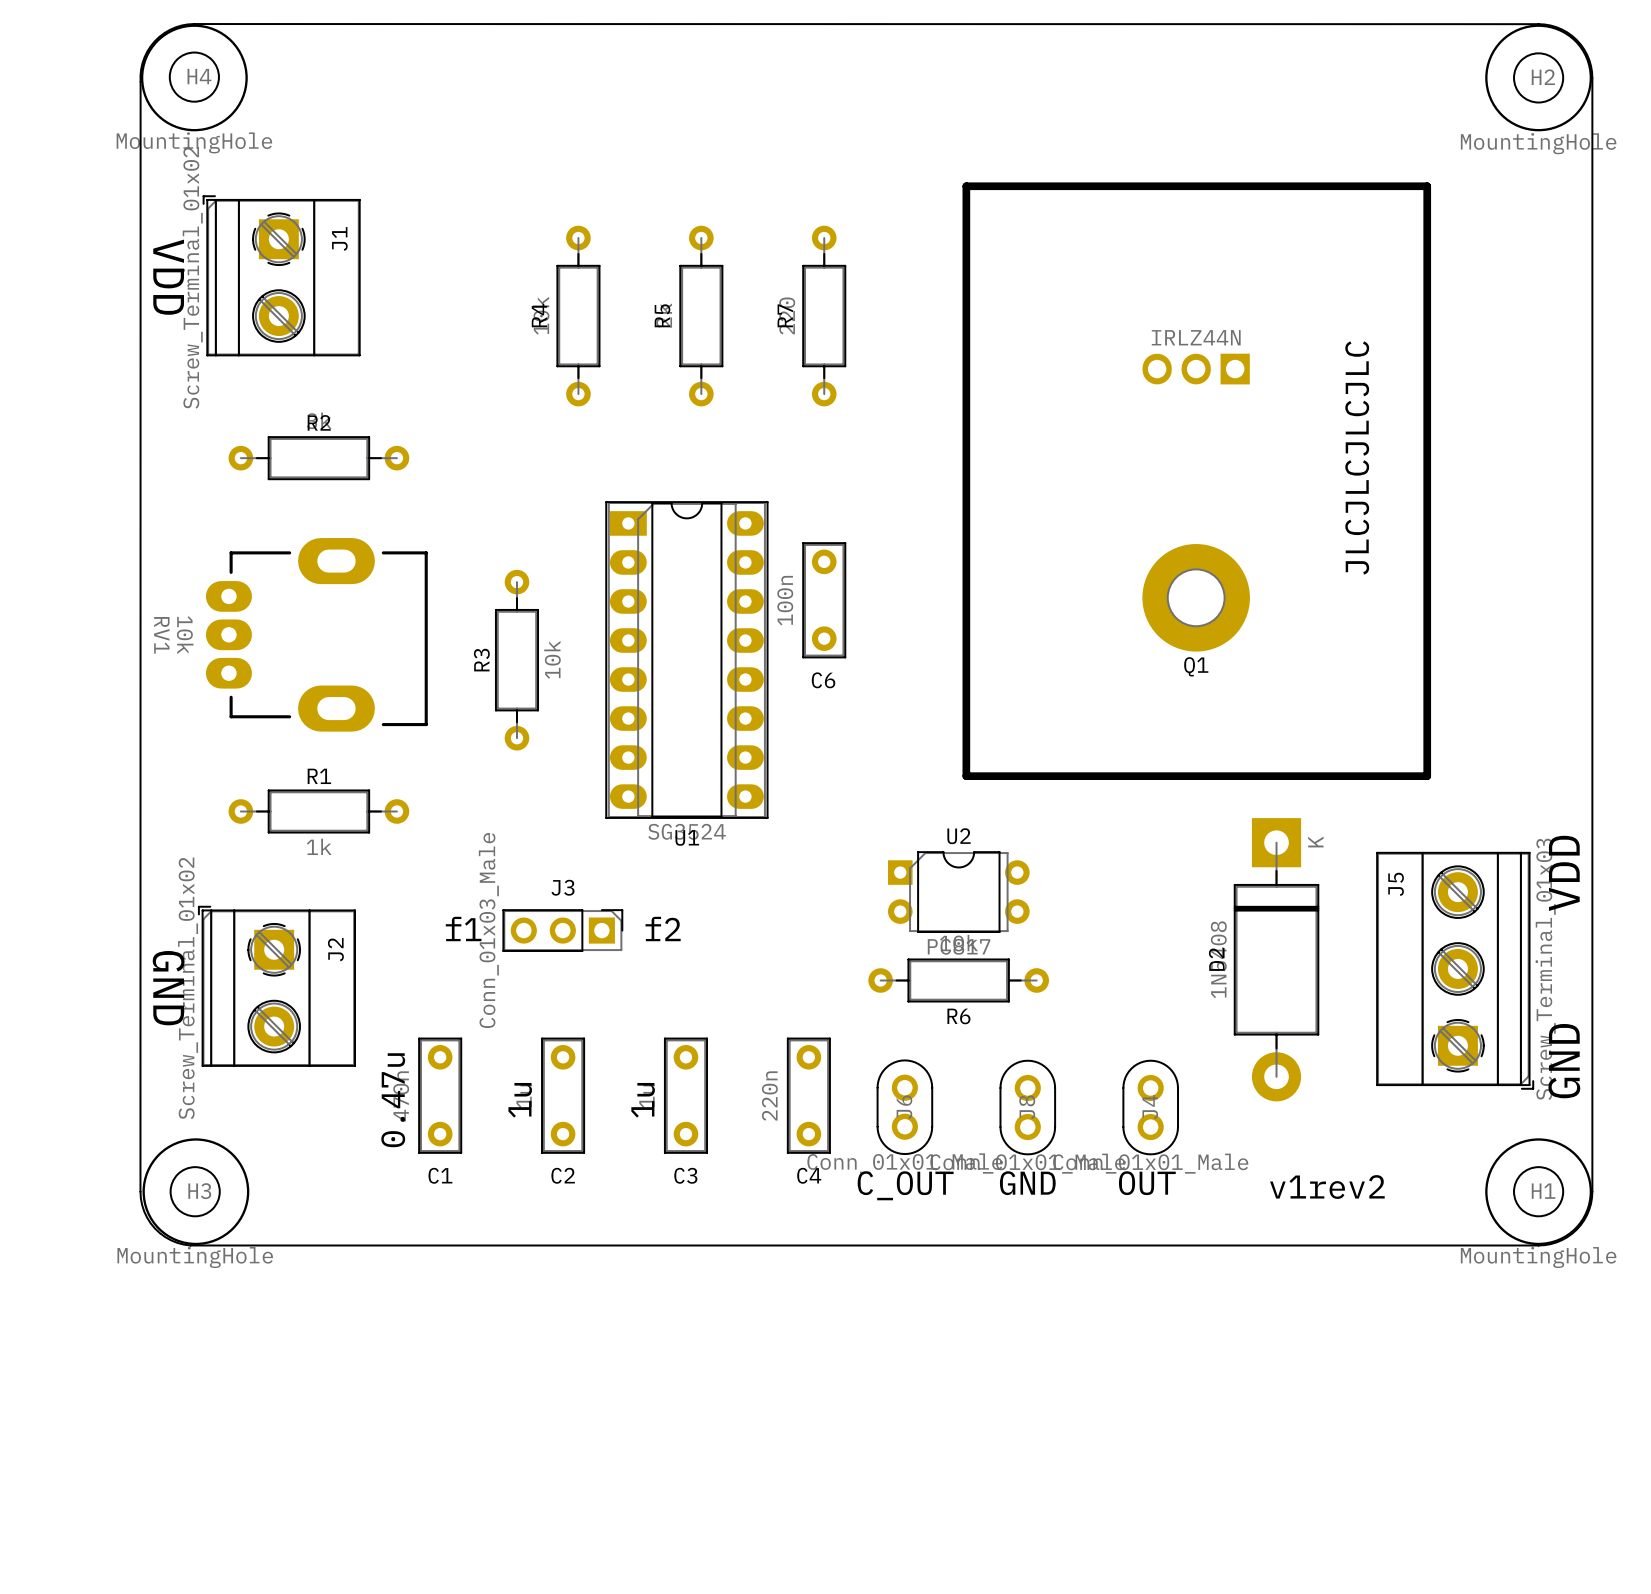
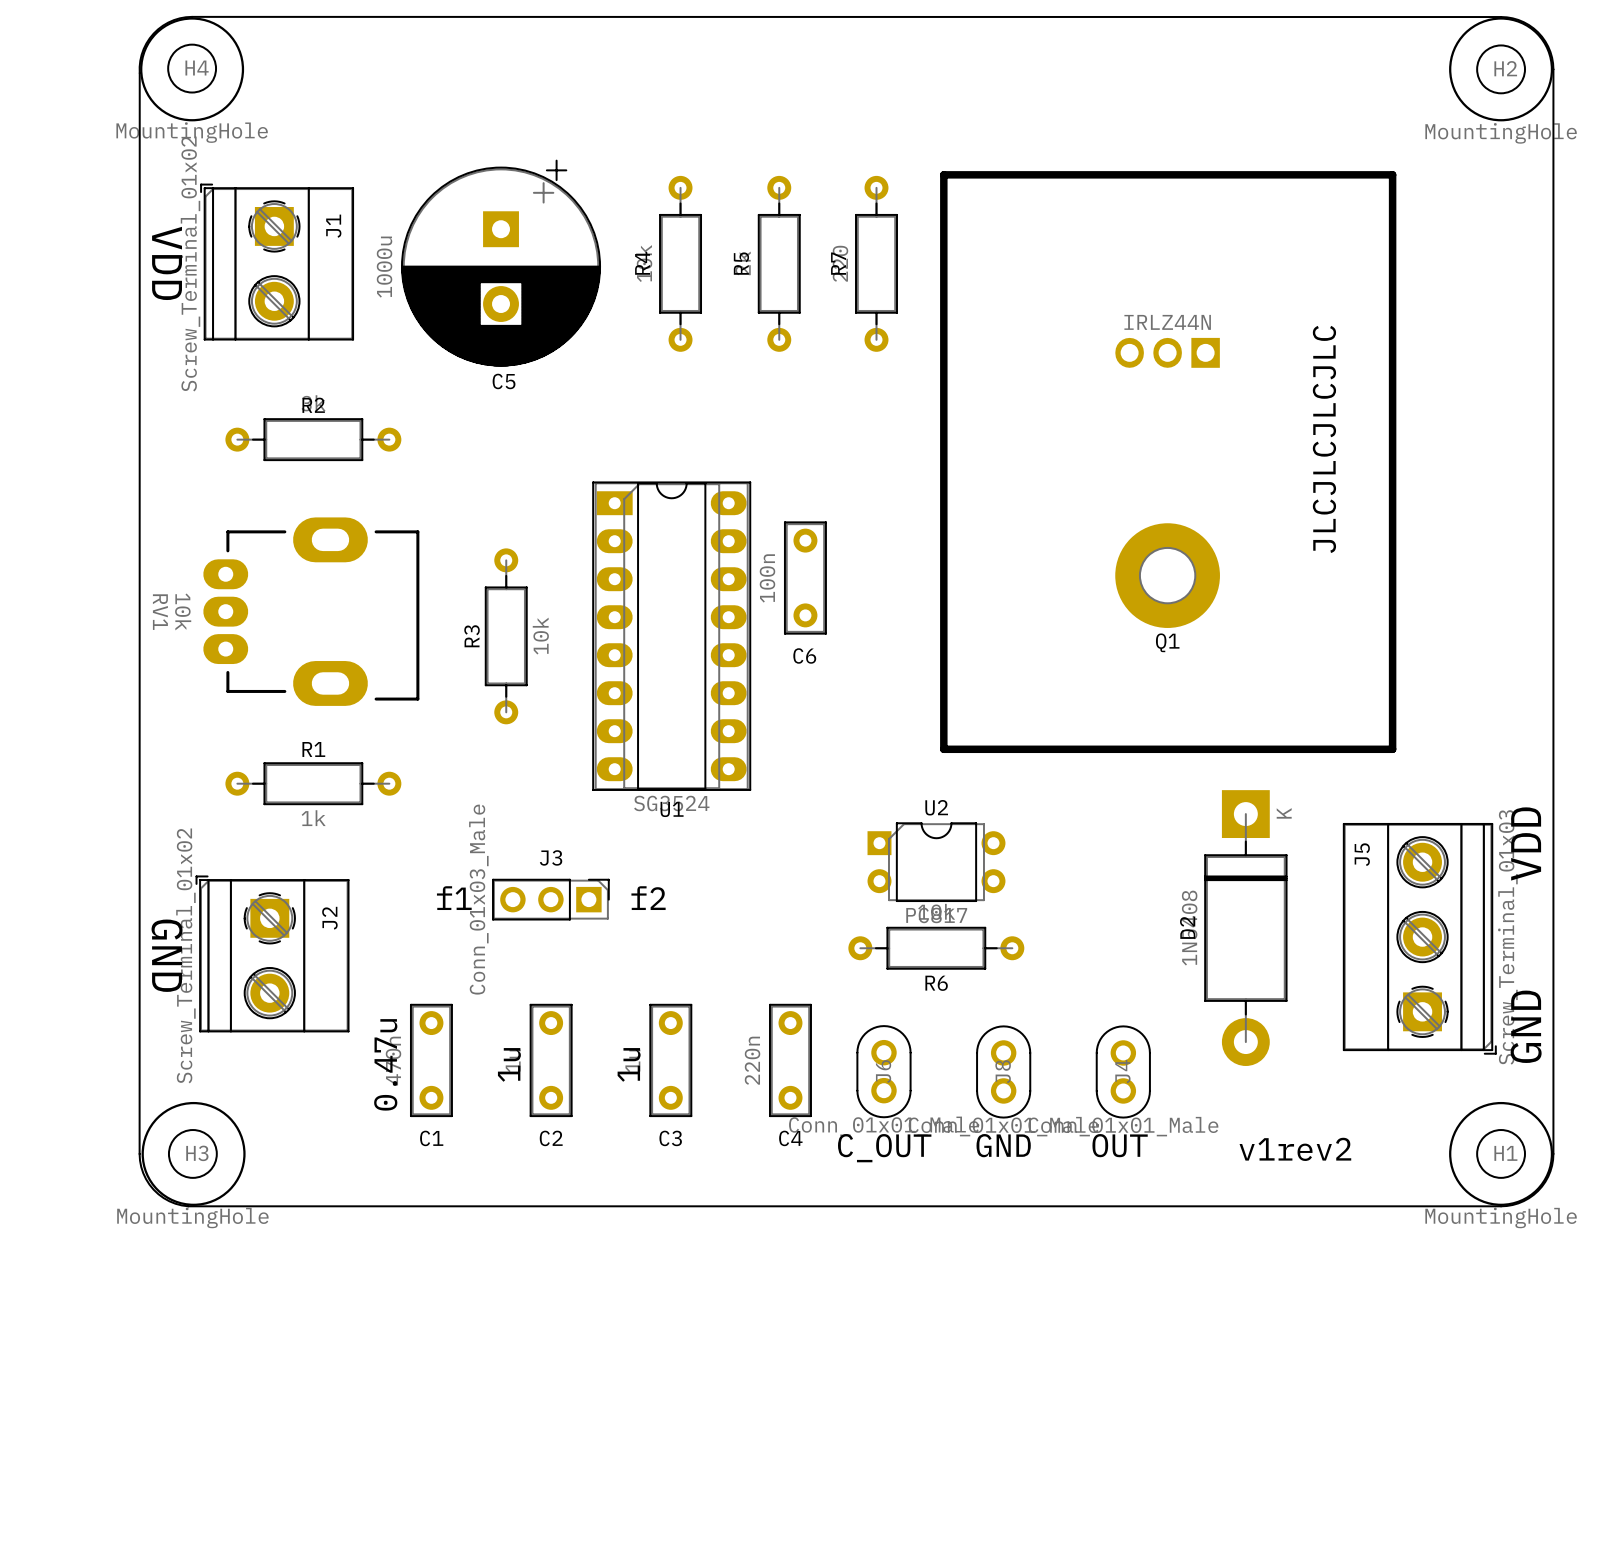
C5: none -> 1000u (501, 263)
R4 position: (578, 316) -> (680, 263)
R5 position: (701, 316) -> (779, 263)
R7 position: (824, 316) -> (876, 263)

